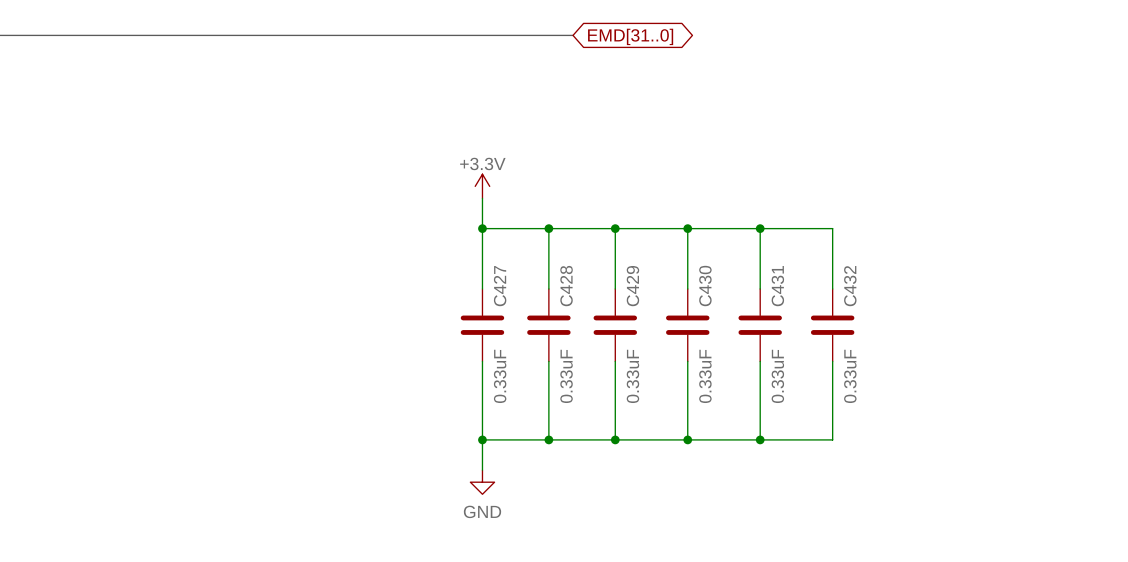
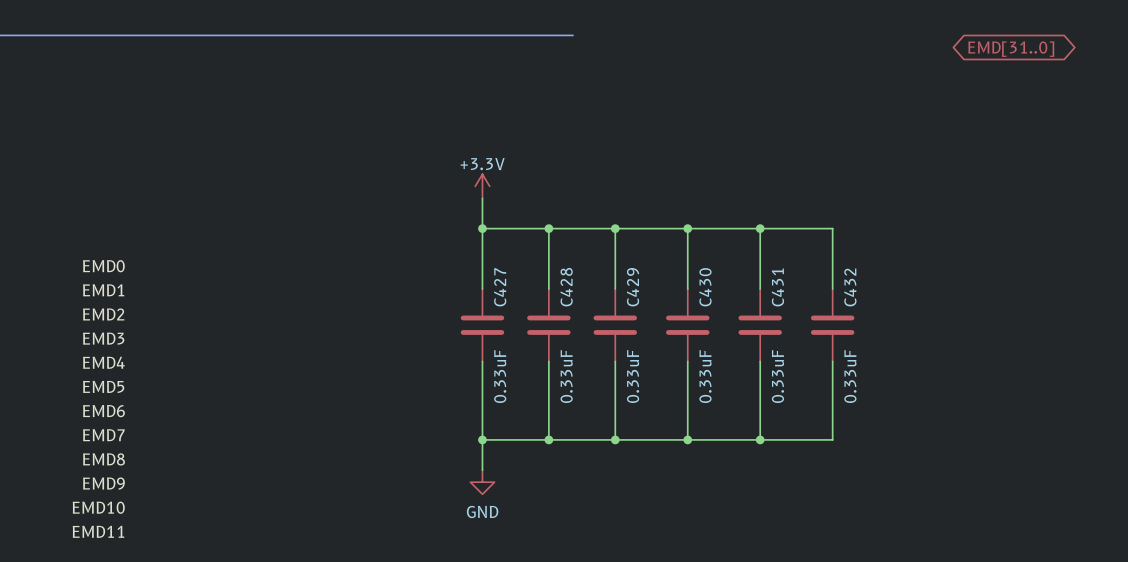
global label: EMD[31..0] (630, 36) -> none
global label: none -> EMD[31..0] (1011, 49)
label: none -> EMD0 (103, 266)
label: none -> EMD1 (103, 290)
label: none -> EMD2 (103, 314)
label: none -> EMD3 (103, 338)
label: none -> EMD4 (103, 362)
label: none -> EMD5 (103, 386)
label: none -> EMD6 (103, 411)
label: none -> EMD7 (103, 435)
label: none -> EMD8 (103, 459)
label: none -> EMD9 (103, 483)
label: none -> EMD10 (98, 507)
label: none -> EMD11 (98, 531)

